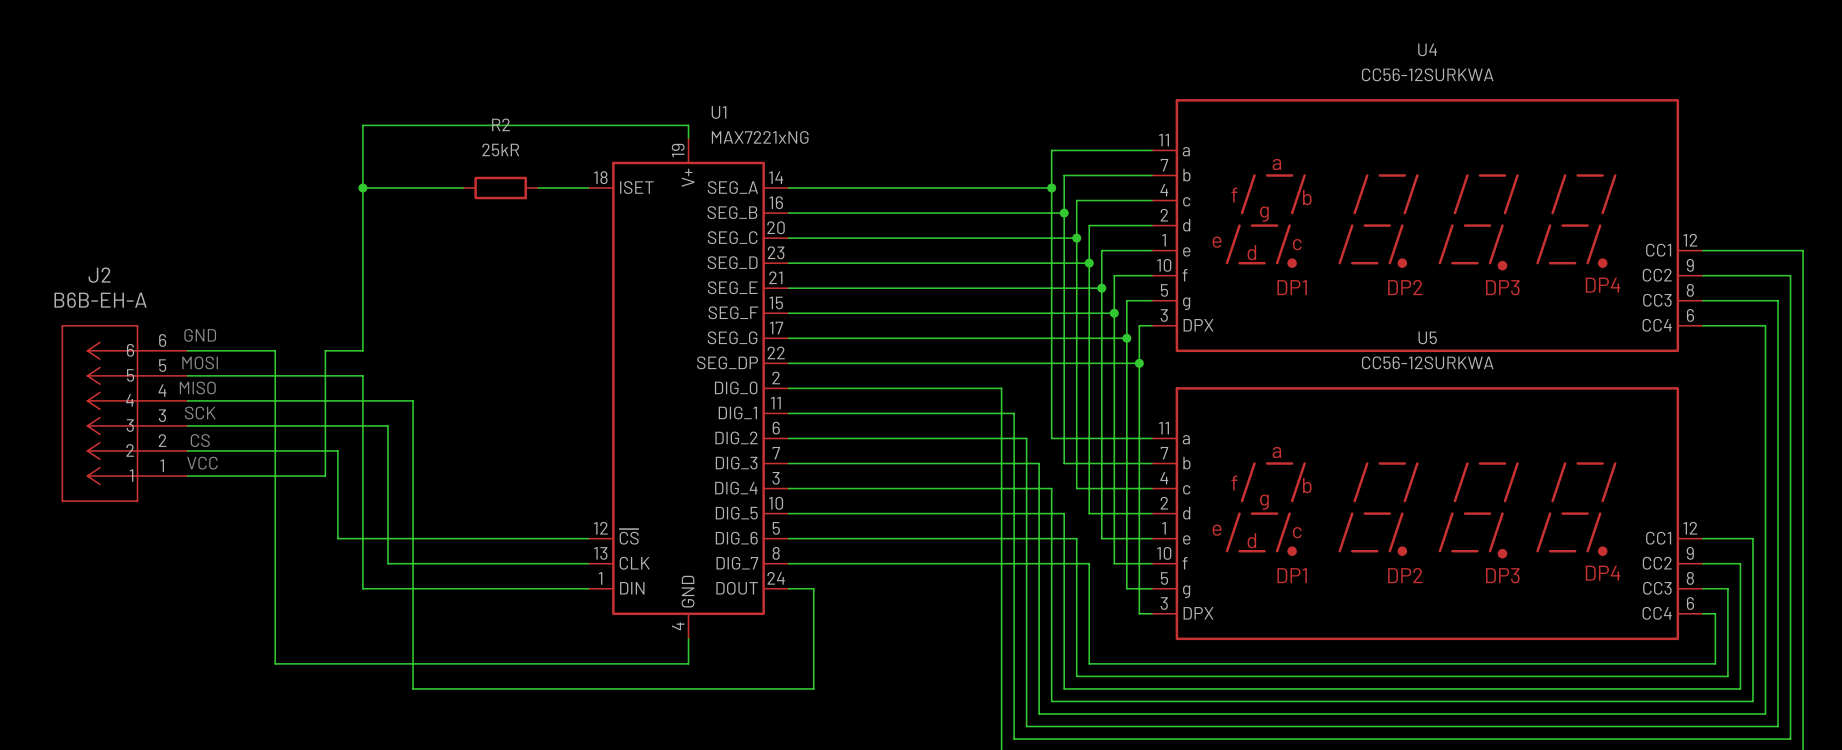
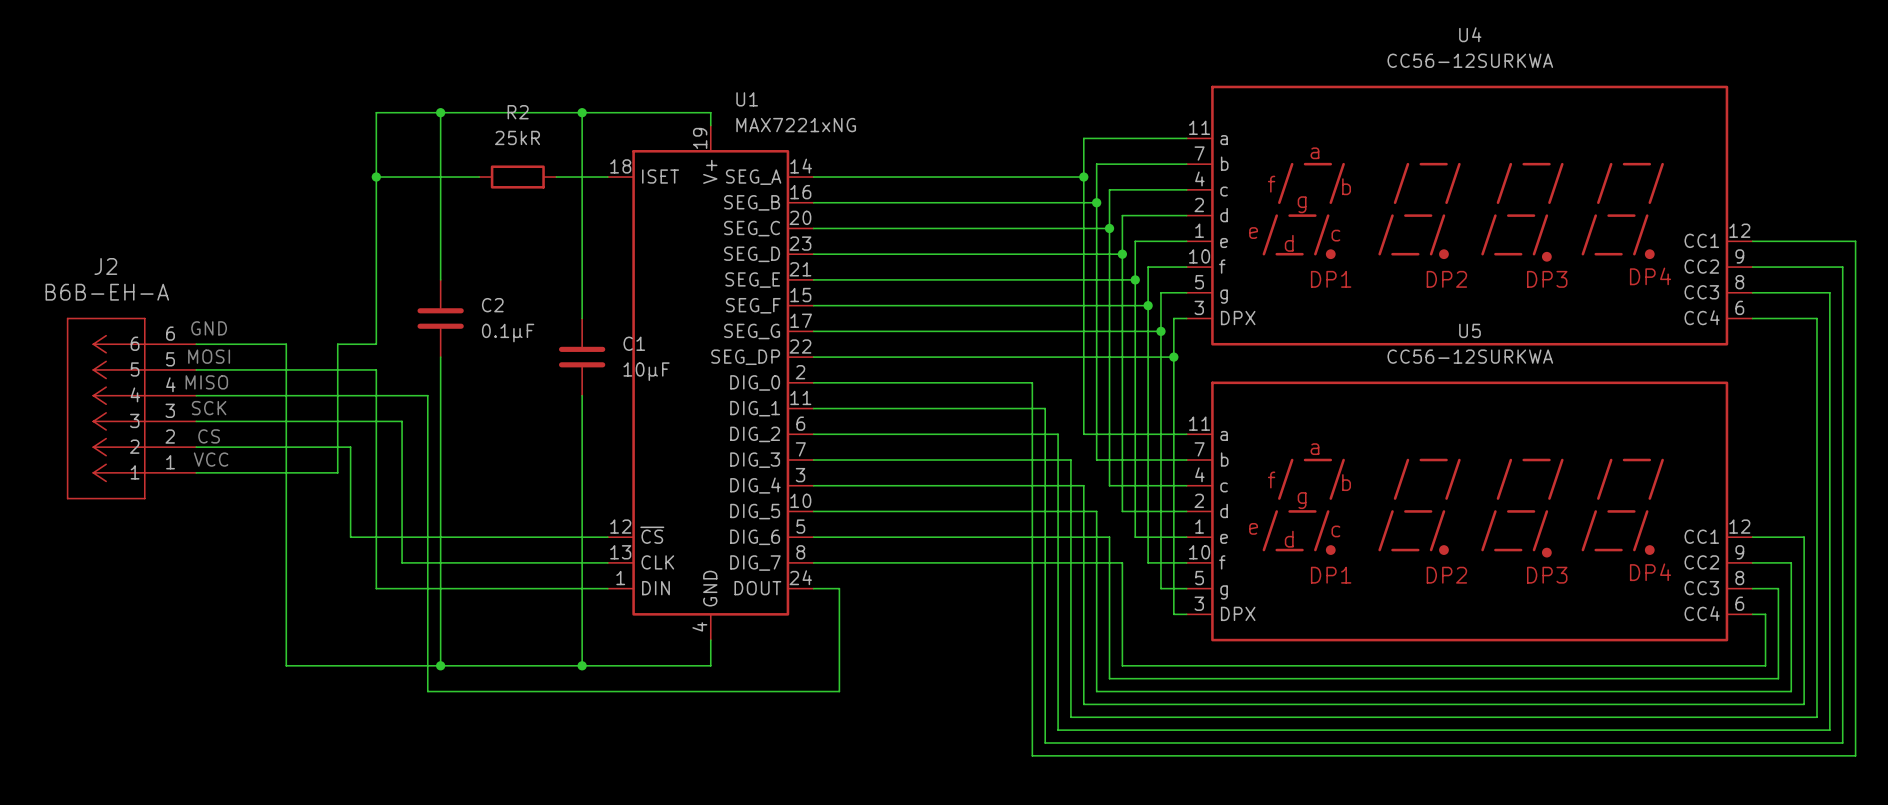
wire: none -> (440, 112) (440, 279)
junction: none -> (440, 112)
wire: none -> (582, 112) (582, 318)
junction: none -> (582, 112)
C2: none -> 0.1µF (440, 318)
wire: none -> (440, 357) (440, 665)
C1: none -> 10µF (582, 357)
wire: none -> (582, 395) (582, 665)
junction: none -> (440, 665)
junction: none -> (582, 665)

